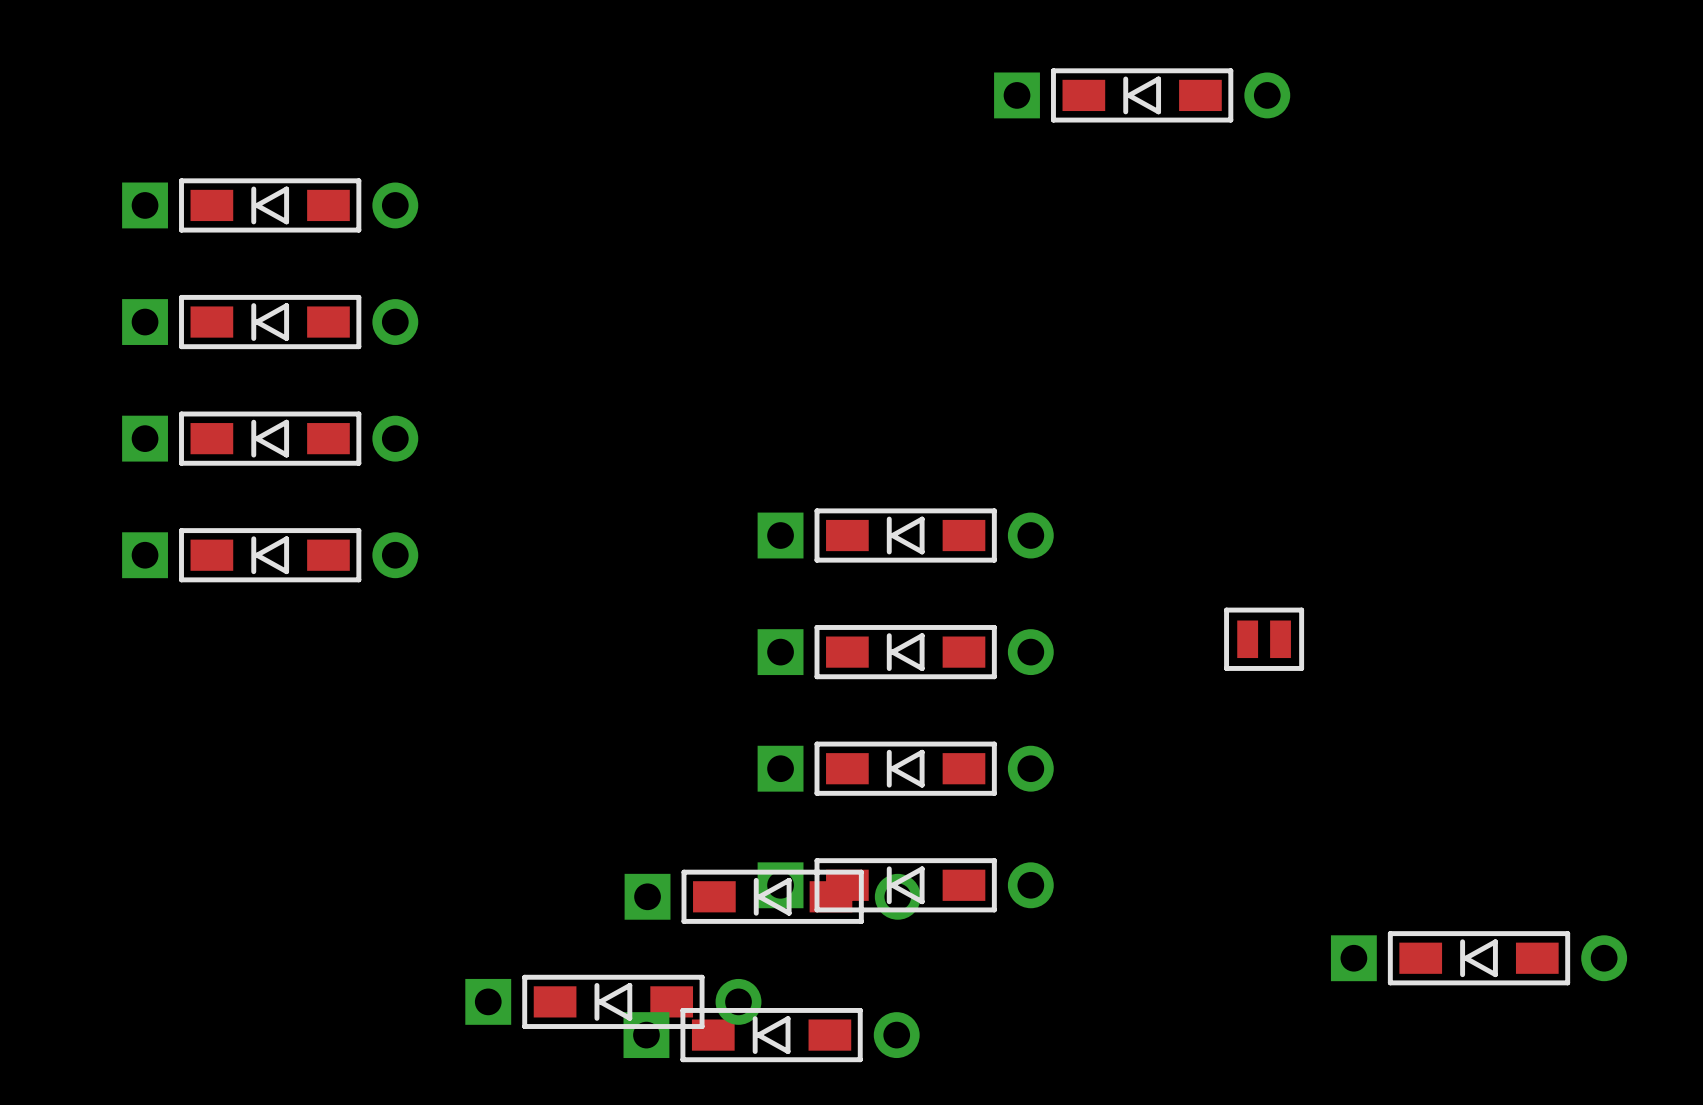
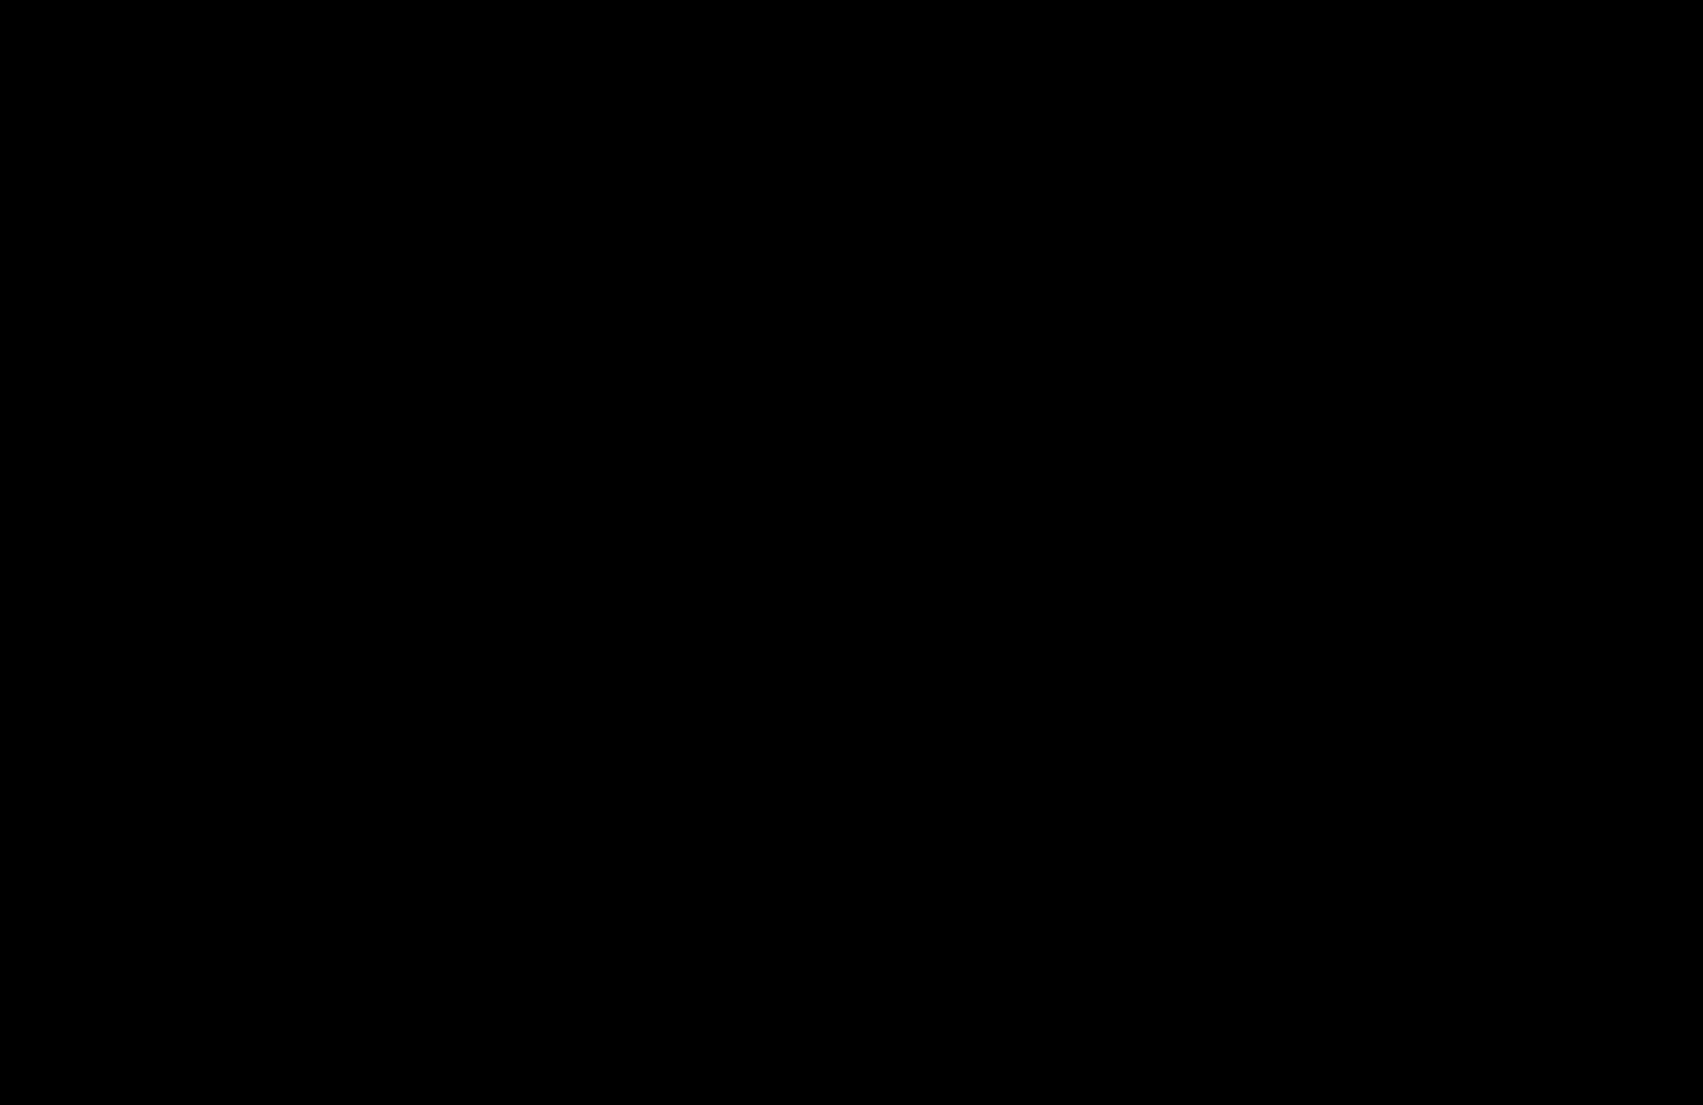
part: (1142, 95) -> none
part: (270, 205) -> none
part: (270, 322) -> none
part: (270, 438) -> none
part: (905, 535) -> none
part: (270, 555) -> none
part: (1264, 639) -> none
part: (905, 652) -> none
part: (905, 768) -> none
part: (905, 885) -> none
part: (772, 896) -> none
part: (1479, 958) -> none
part: (613, 1001) -> none
part: (771, 1035) -> none

